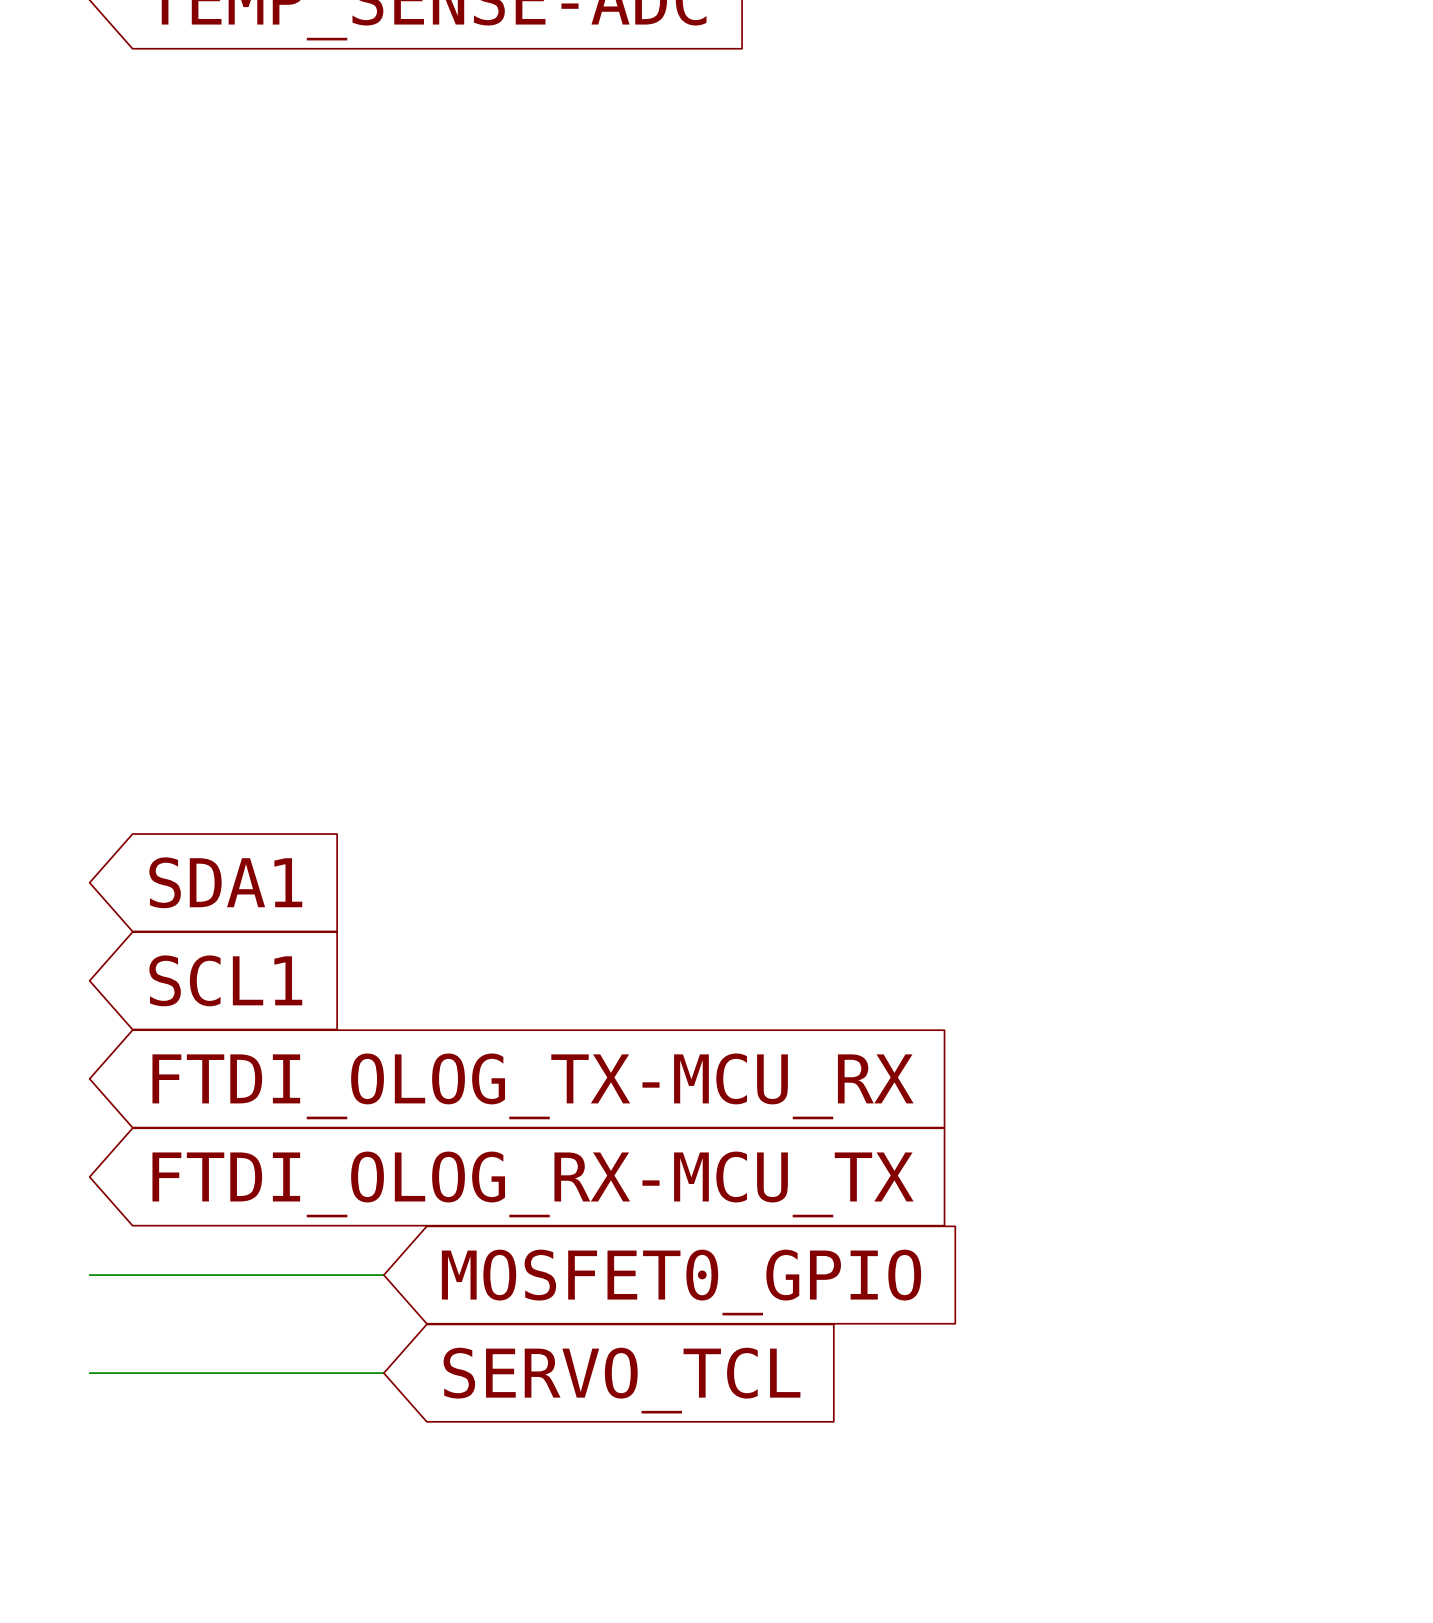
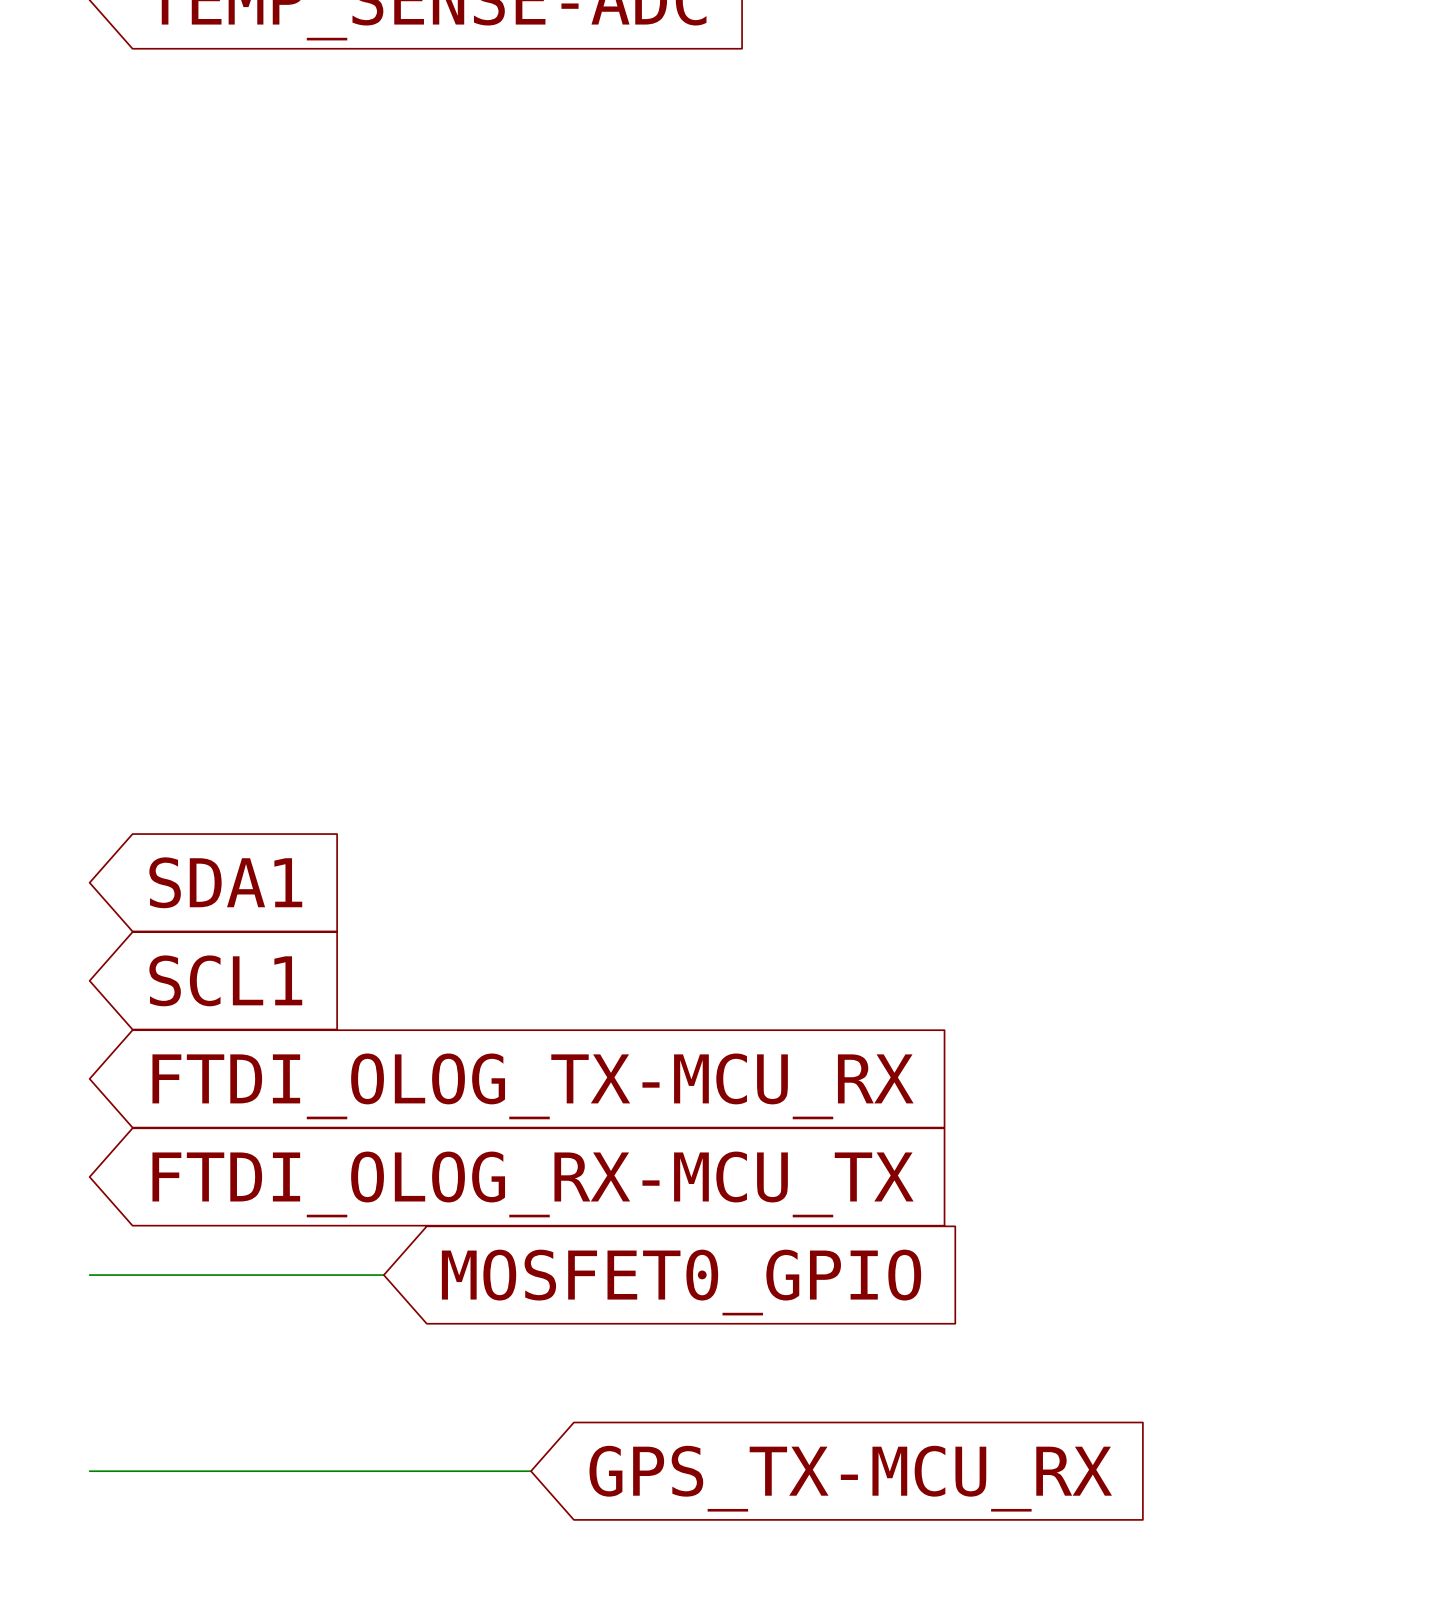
wire: (89, 1373) (383, 1373) -> none
global label: SERVO_TCL (622, 1380) -> none
wire: none -> (89, 1471) (530, 1471)
global label: none -> GPS_TX-MCU_RX (850, 1478)

